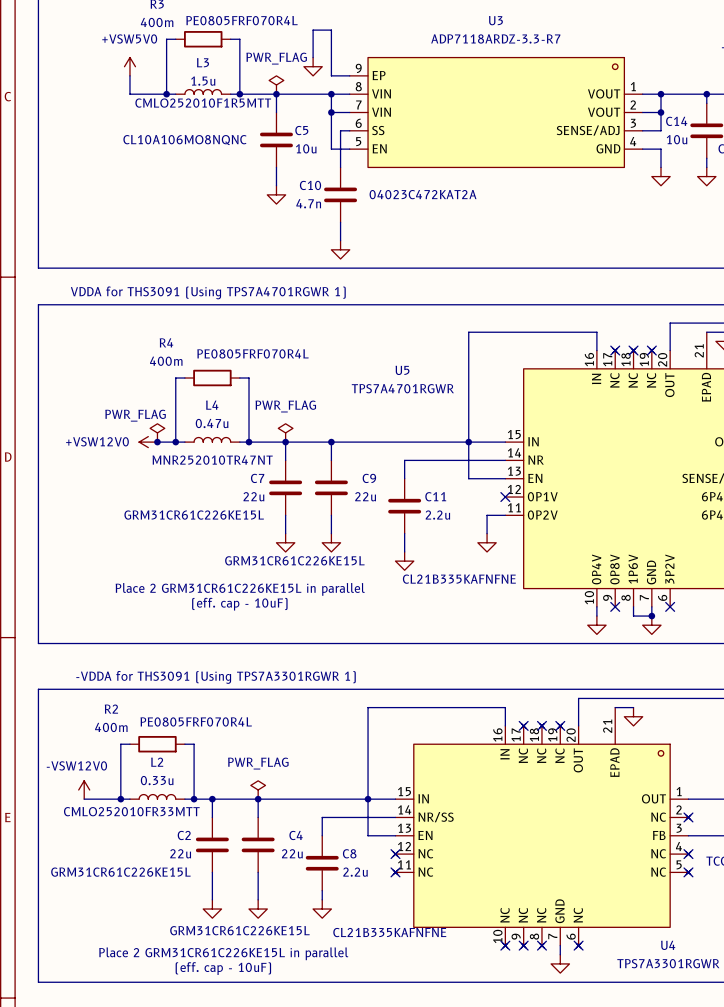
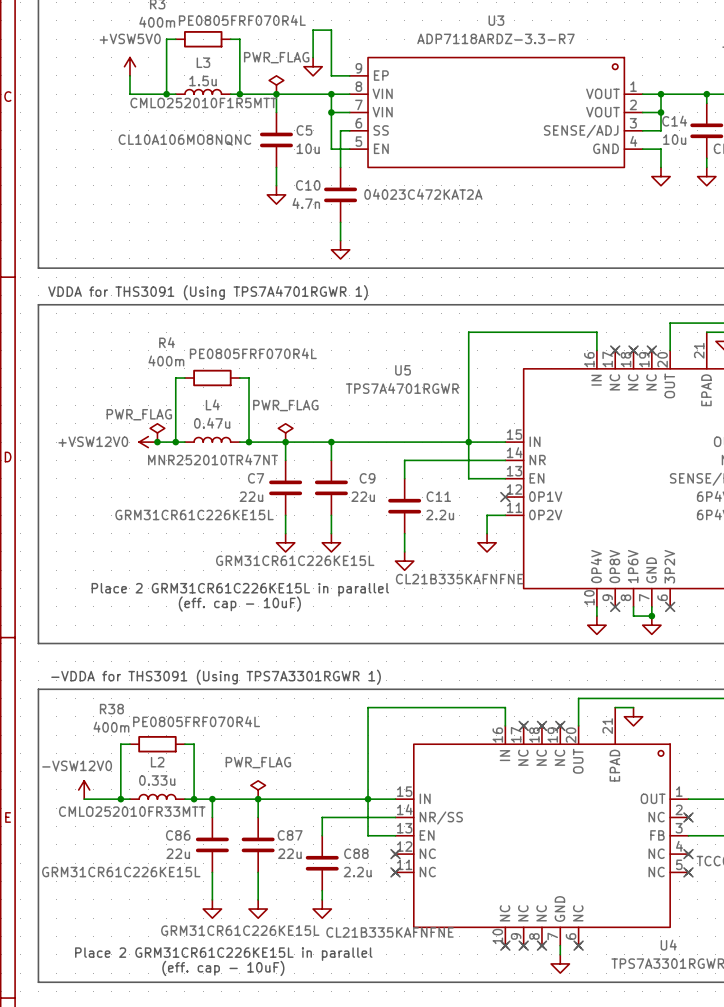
R2 name: R2 (111, 709) -> R38 (111, 709)
C2 name: C2 (184, 835) -> C86 (178, 835)
C4 name: C4 (296, 835) -> C87 (290, 835)
C8 name: C8 (349, 853) -> C88 (356, 853)

